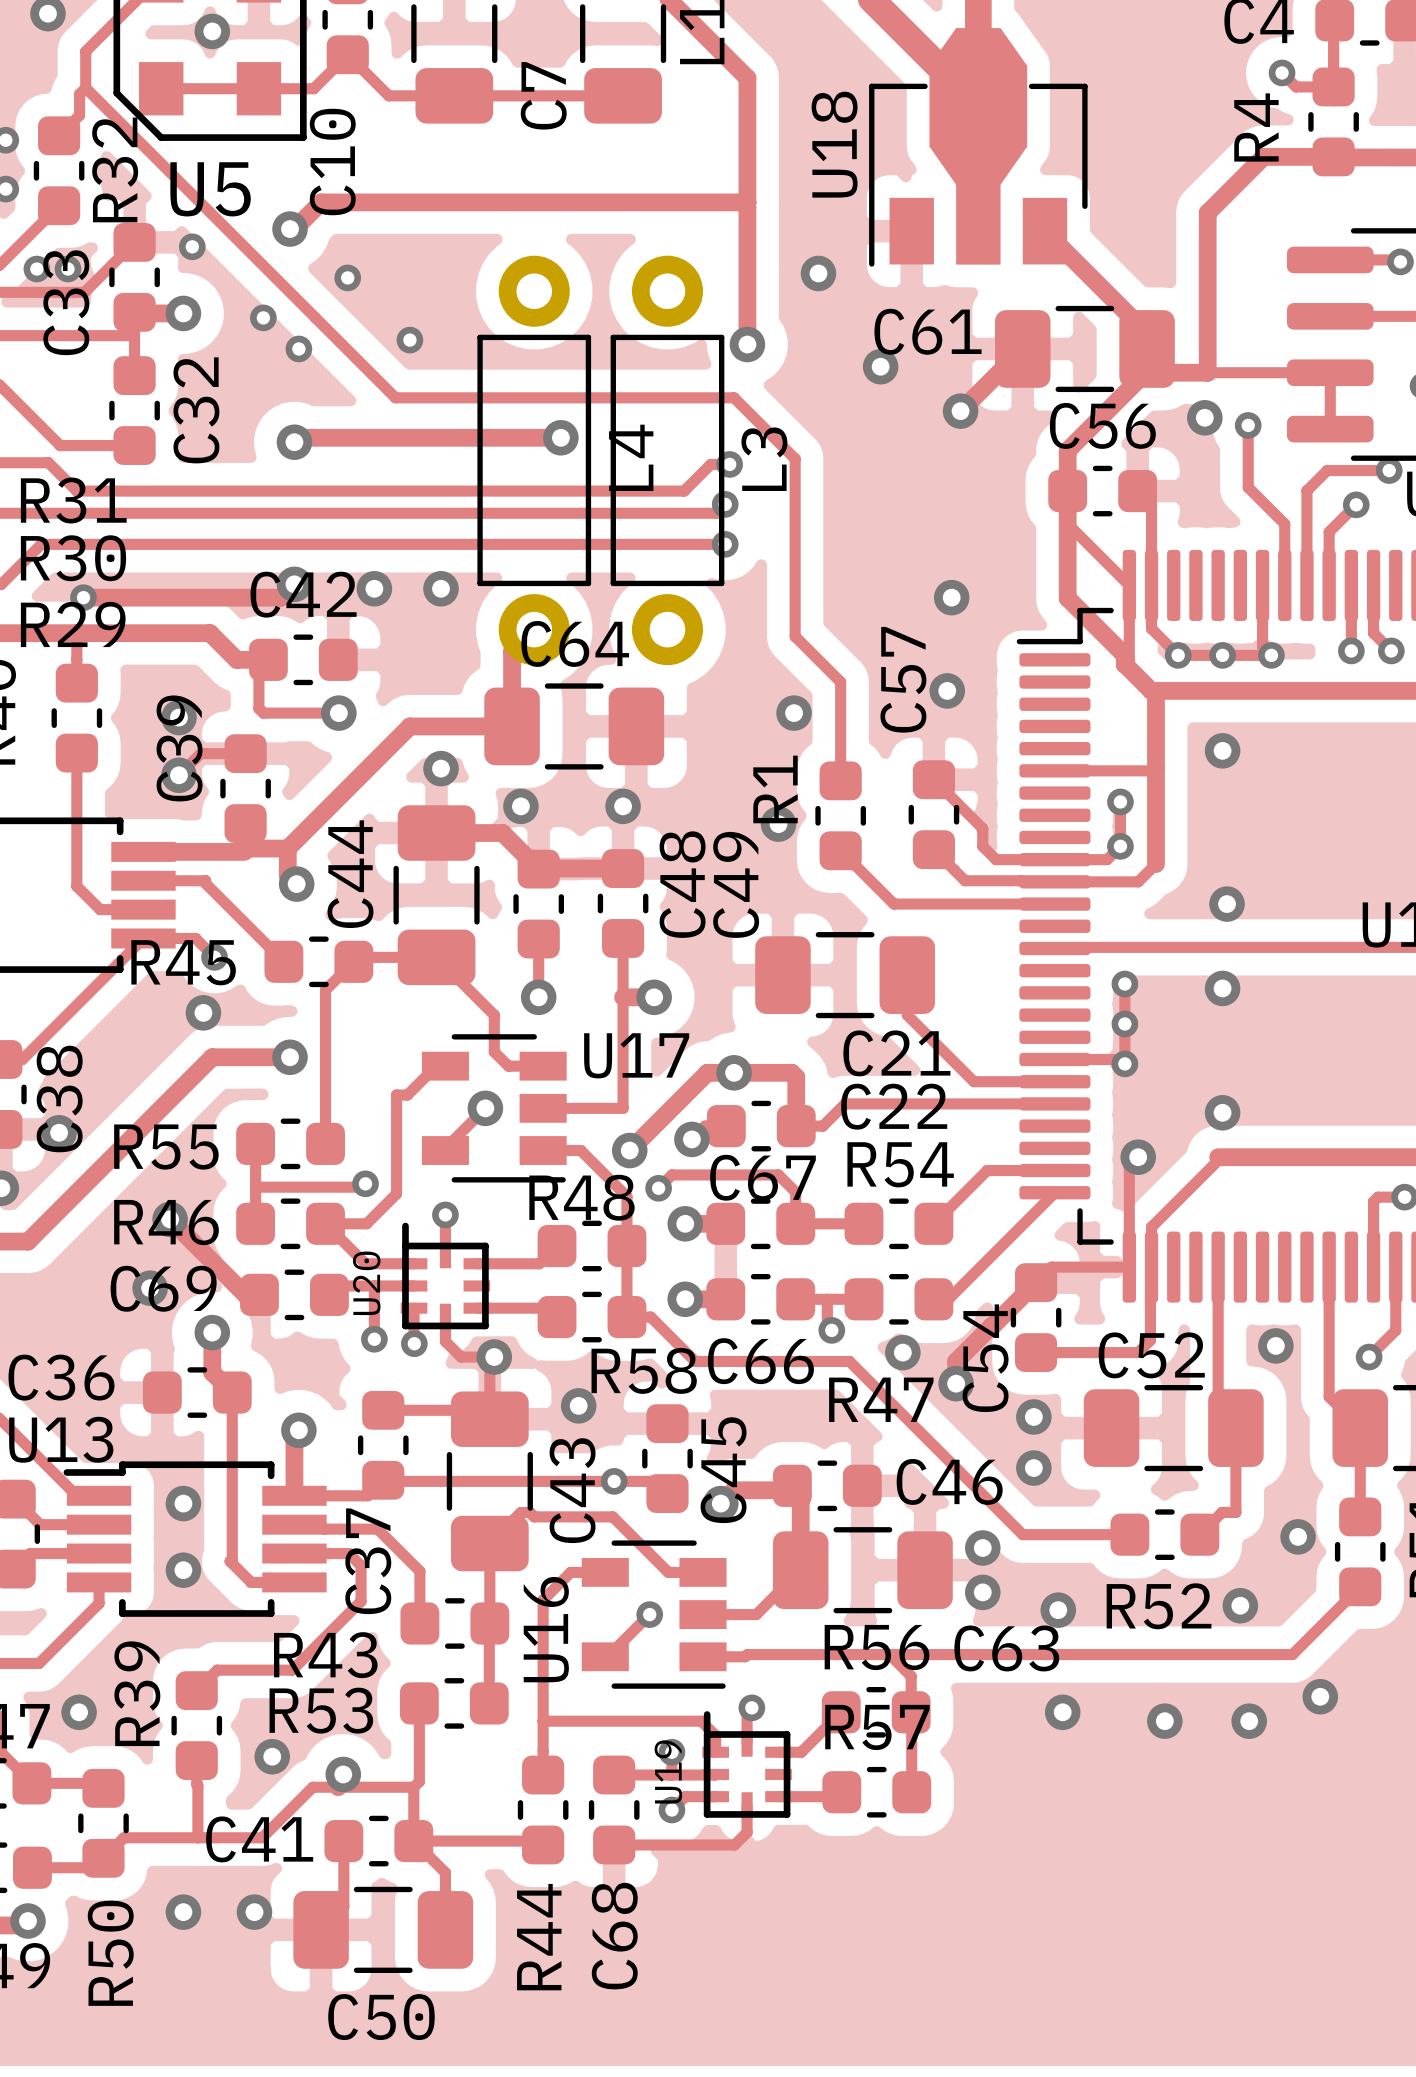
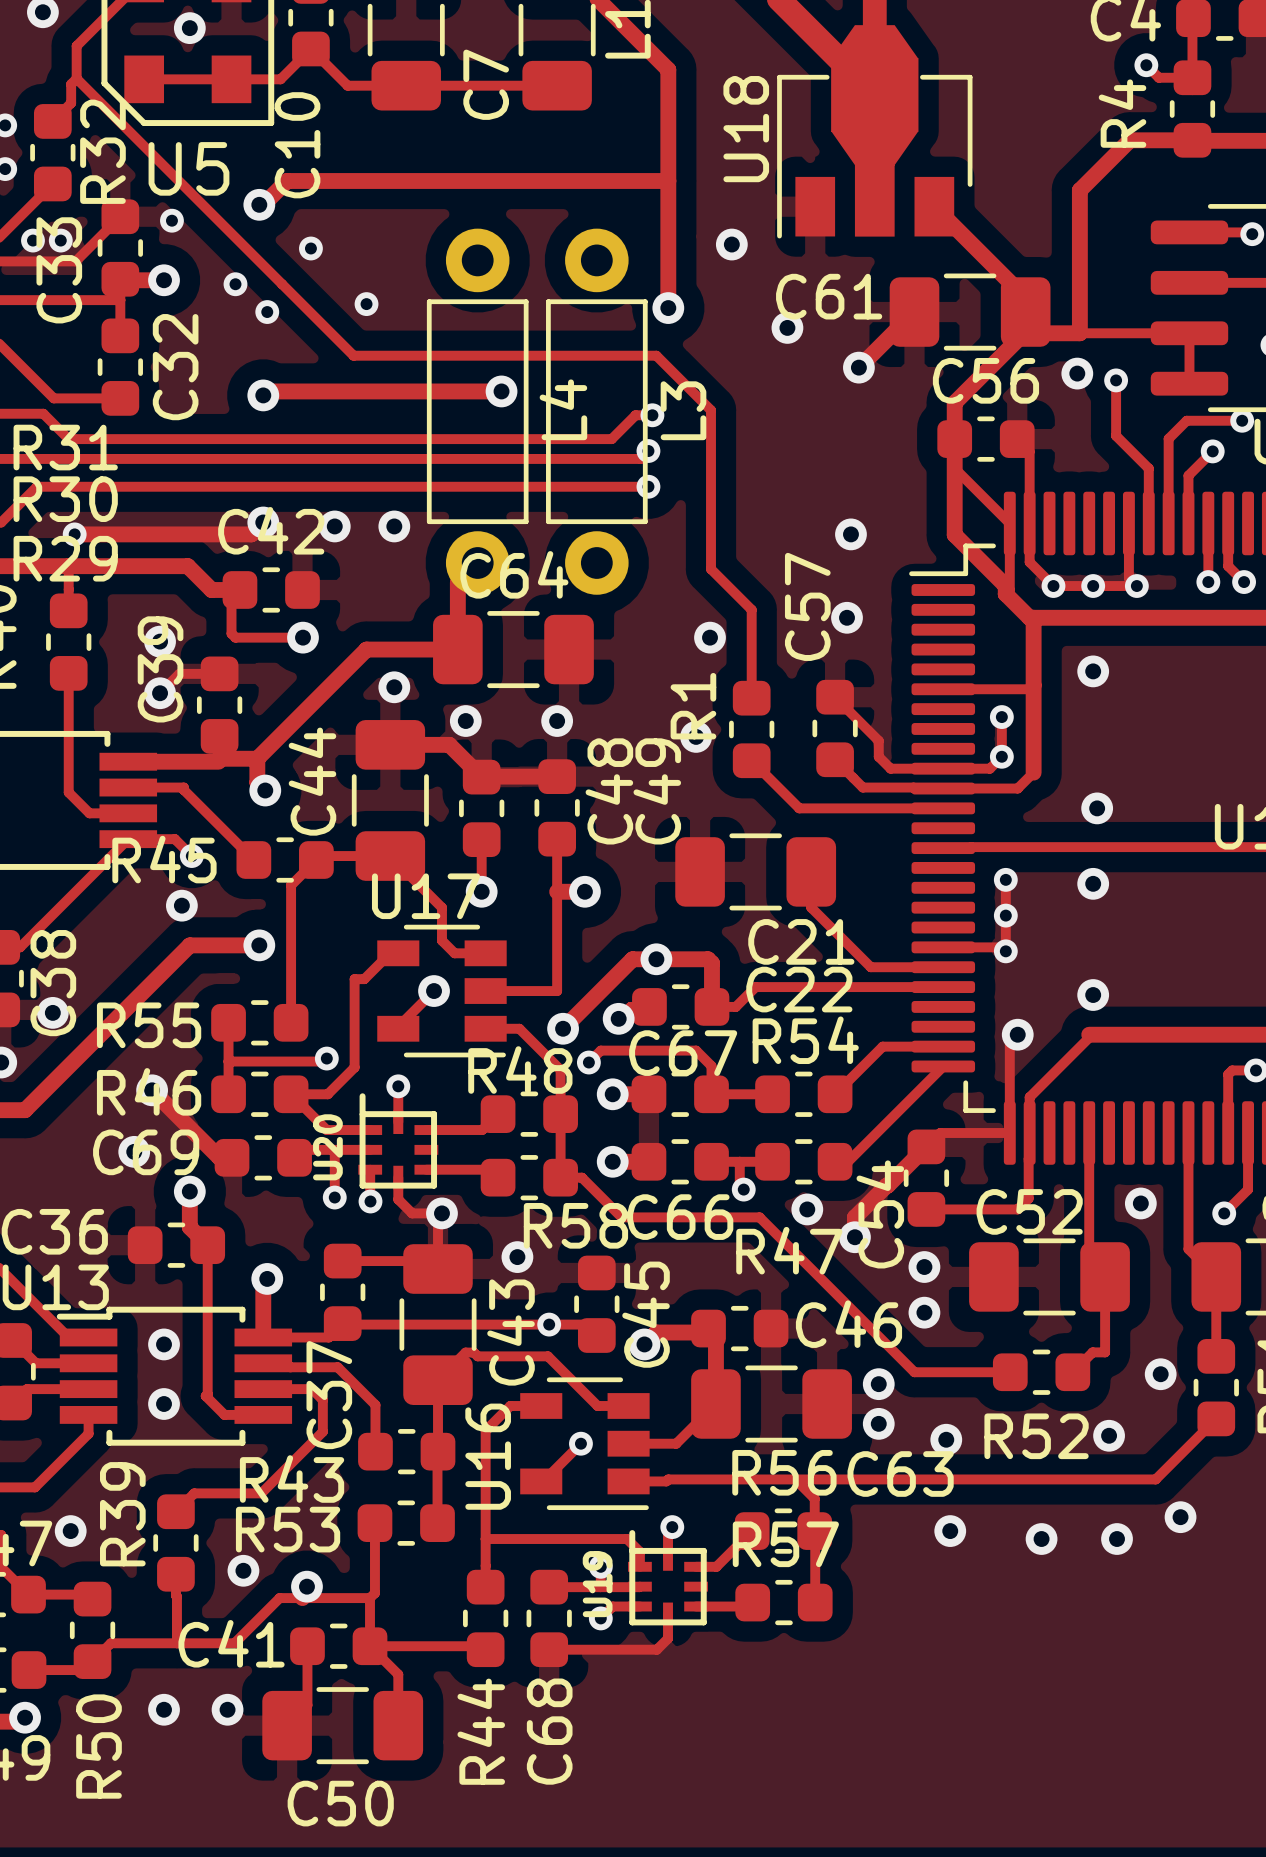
U17 name position: U17 (636, 1055) -> U17 (426, 896)

